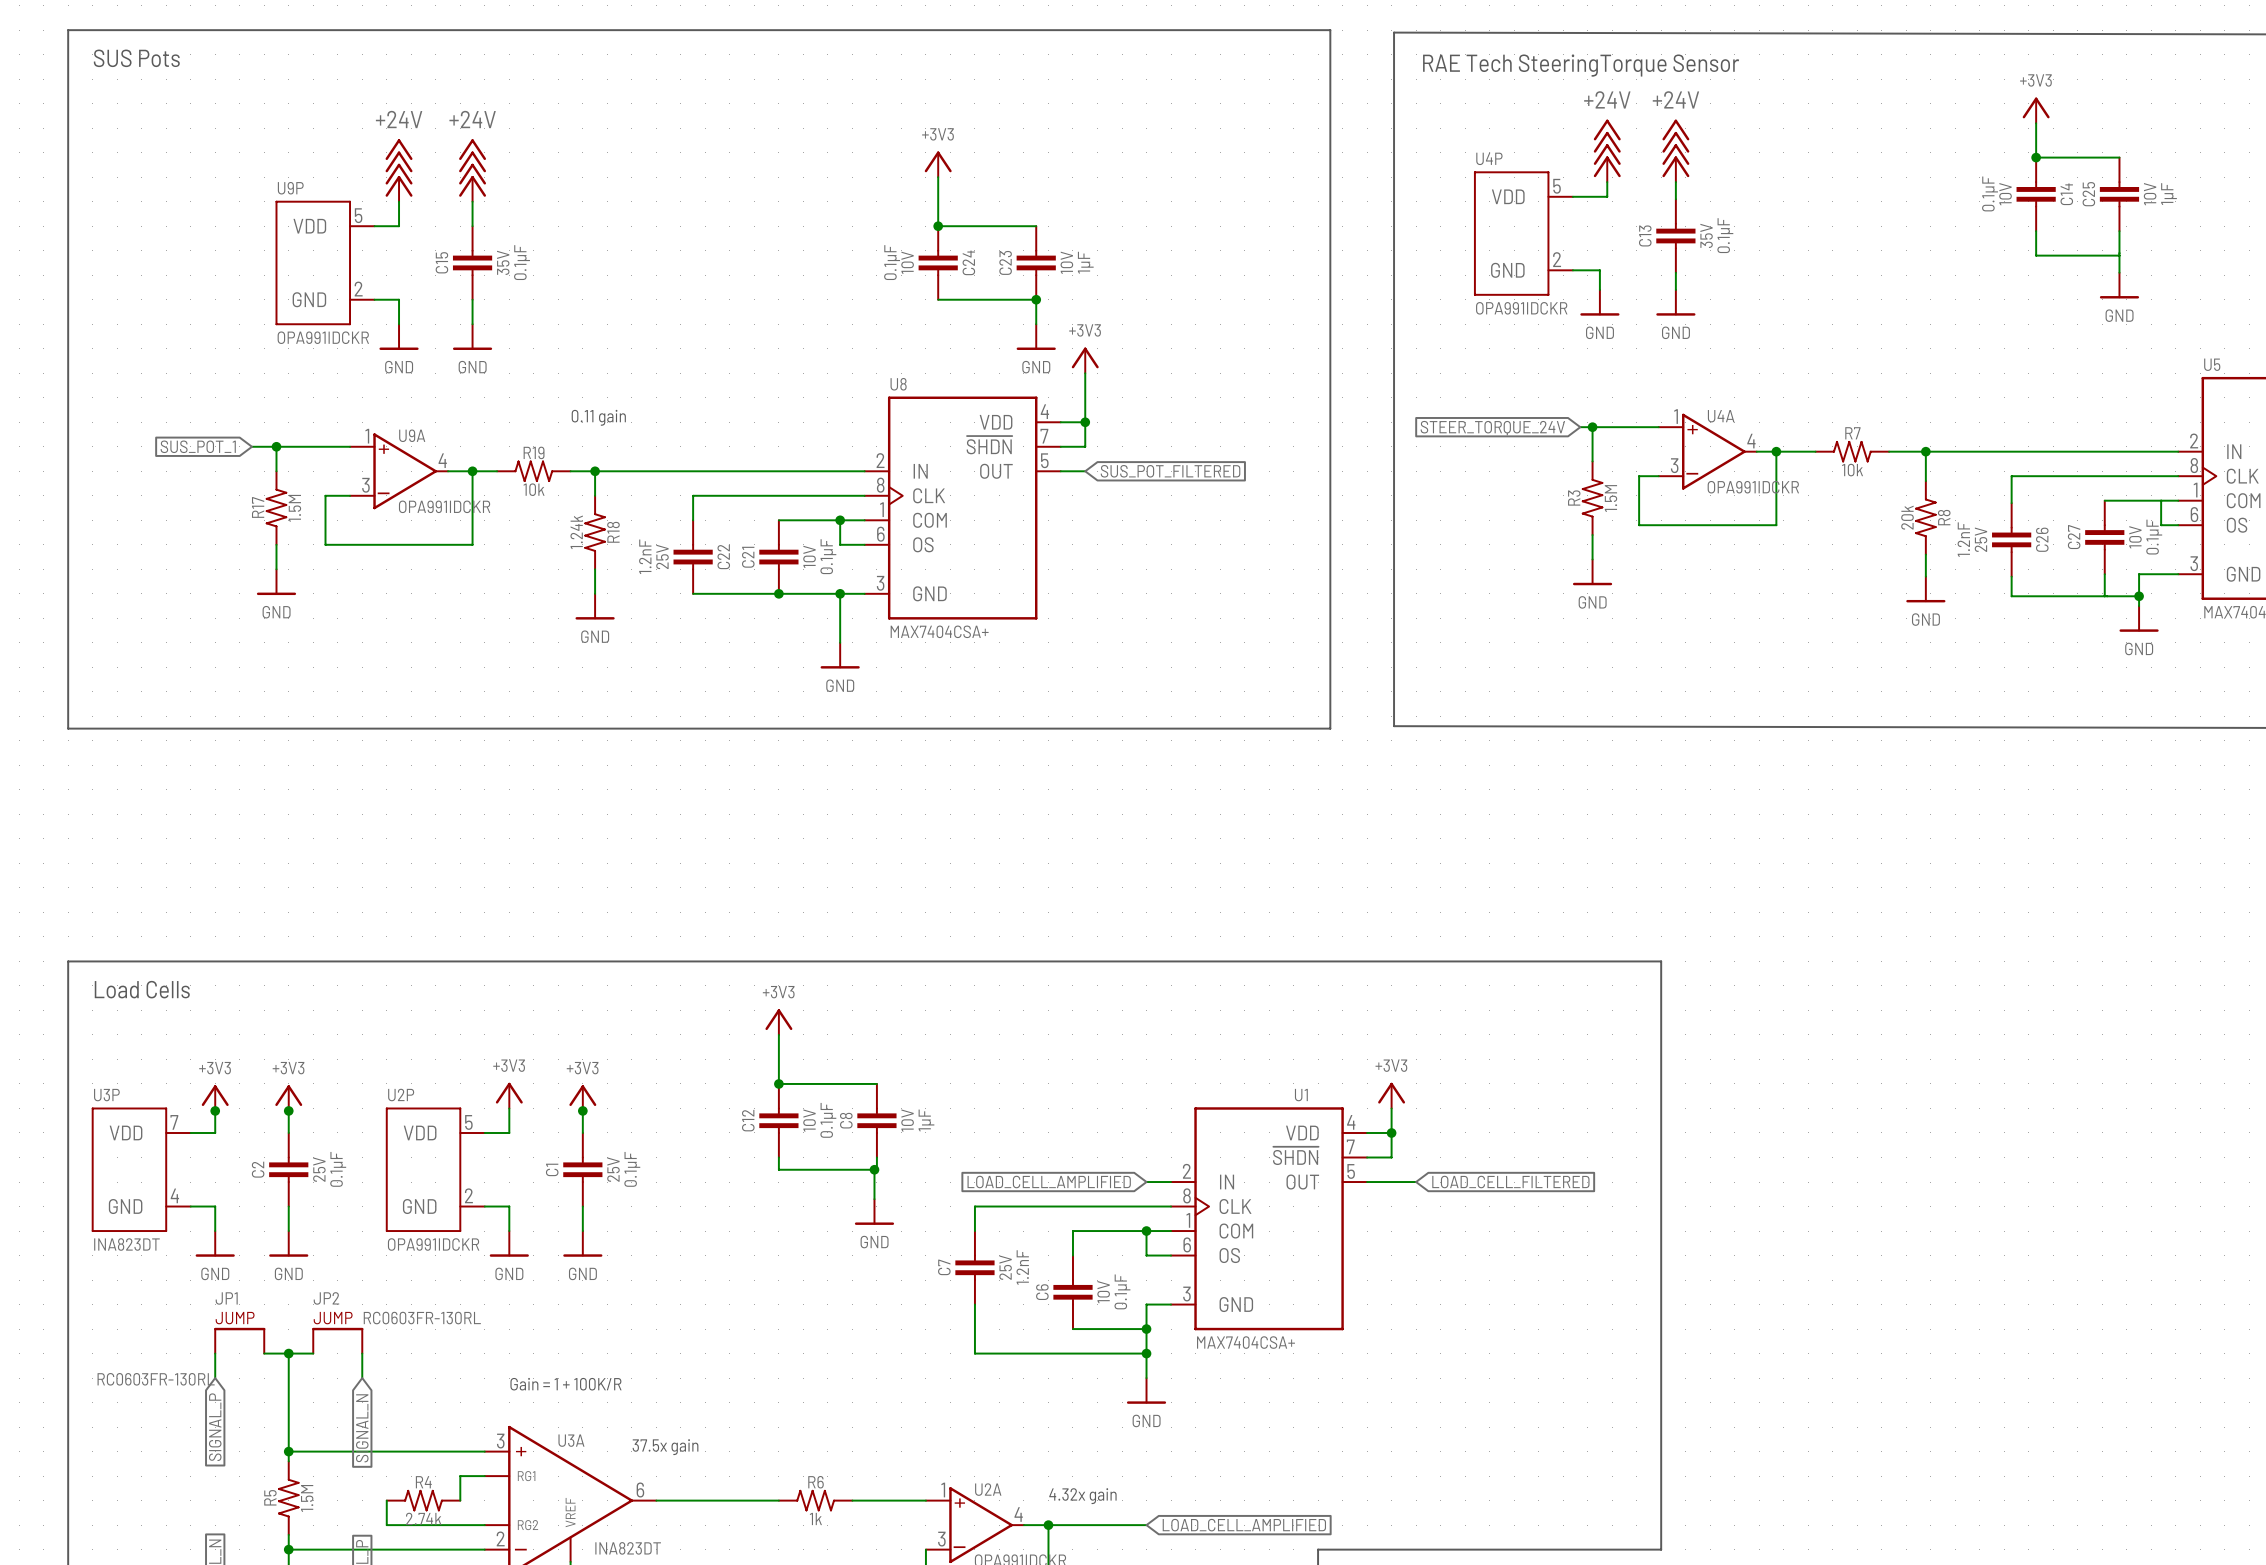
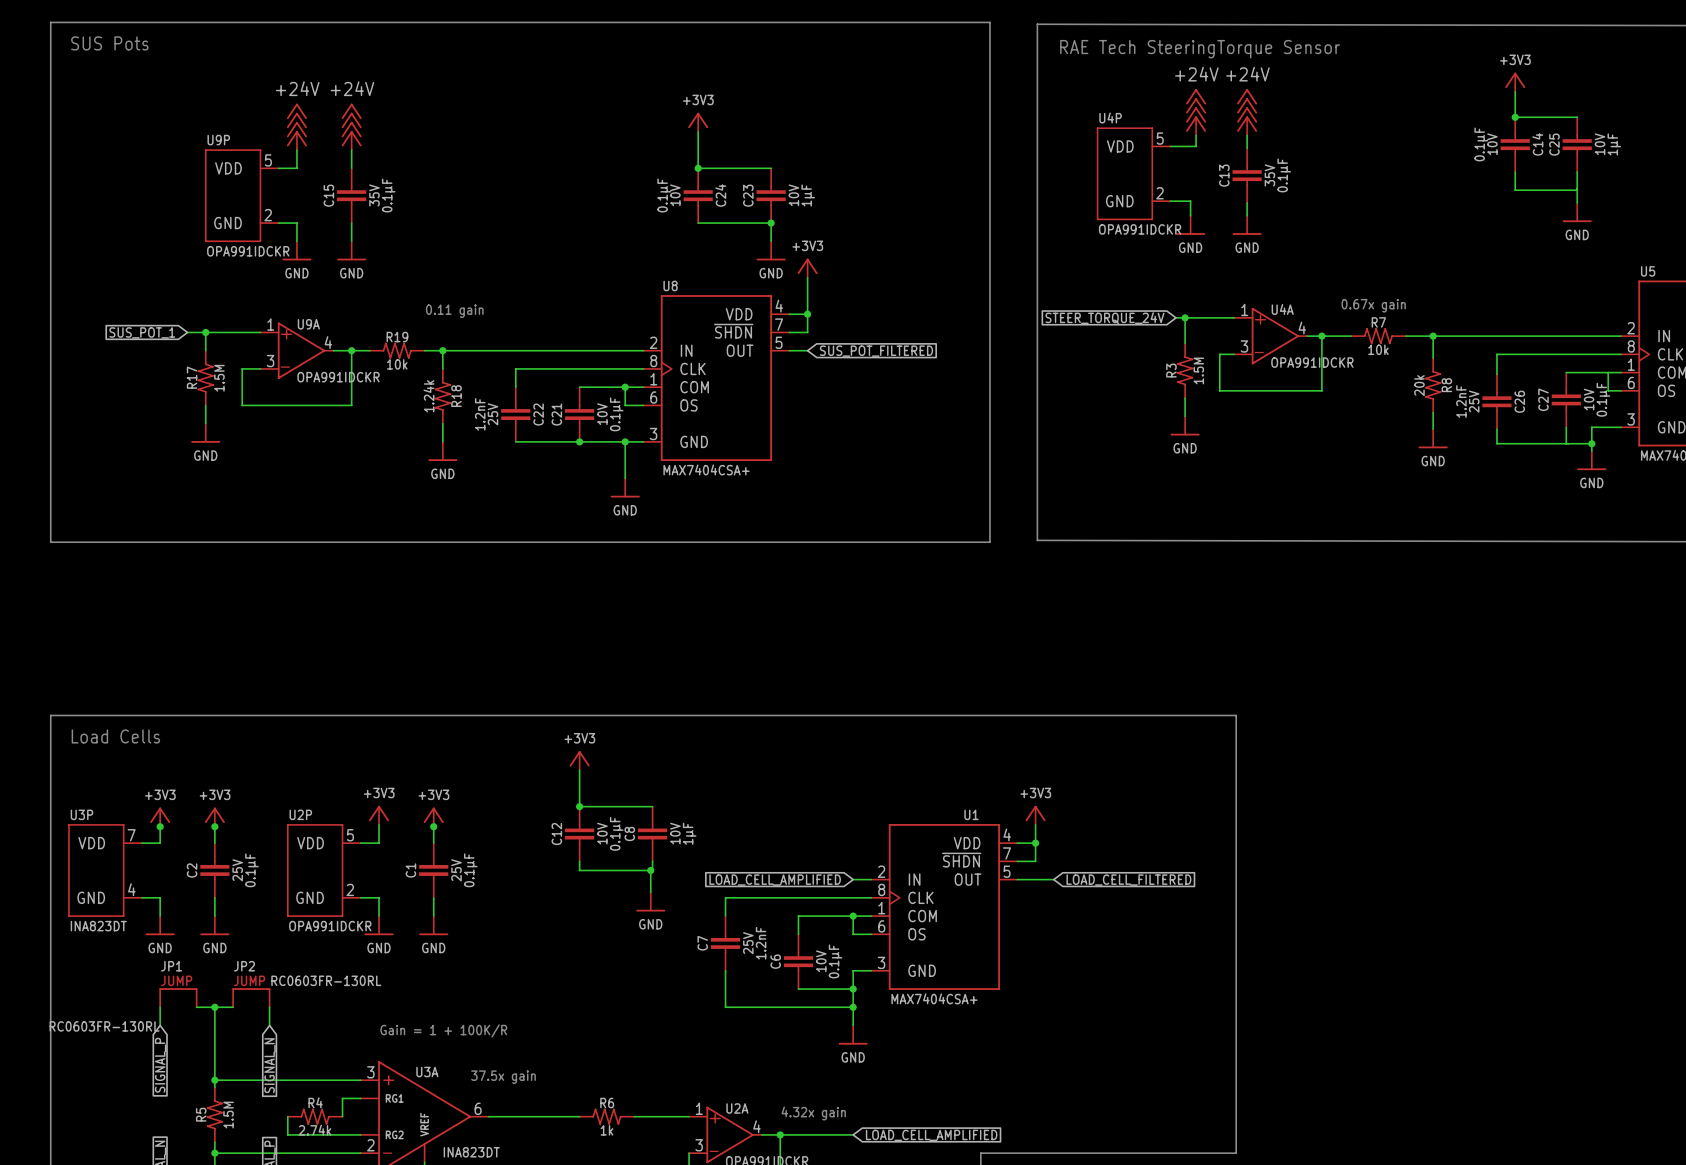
text: none -> 0.67x gain (1373, 305)

